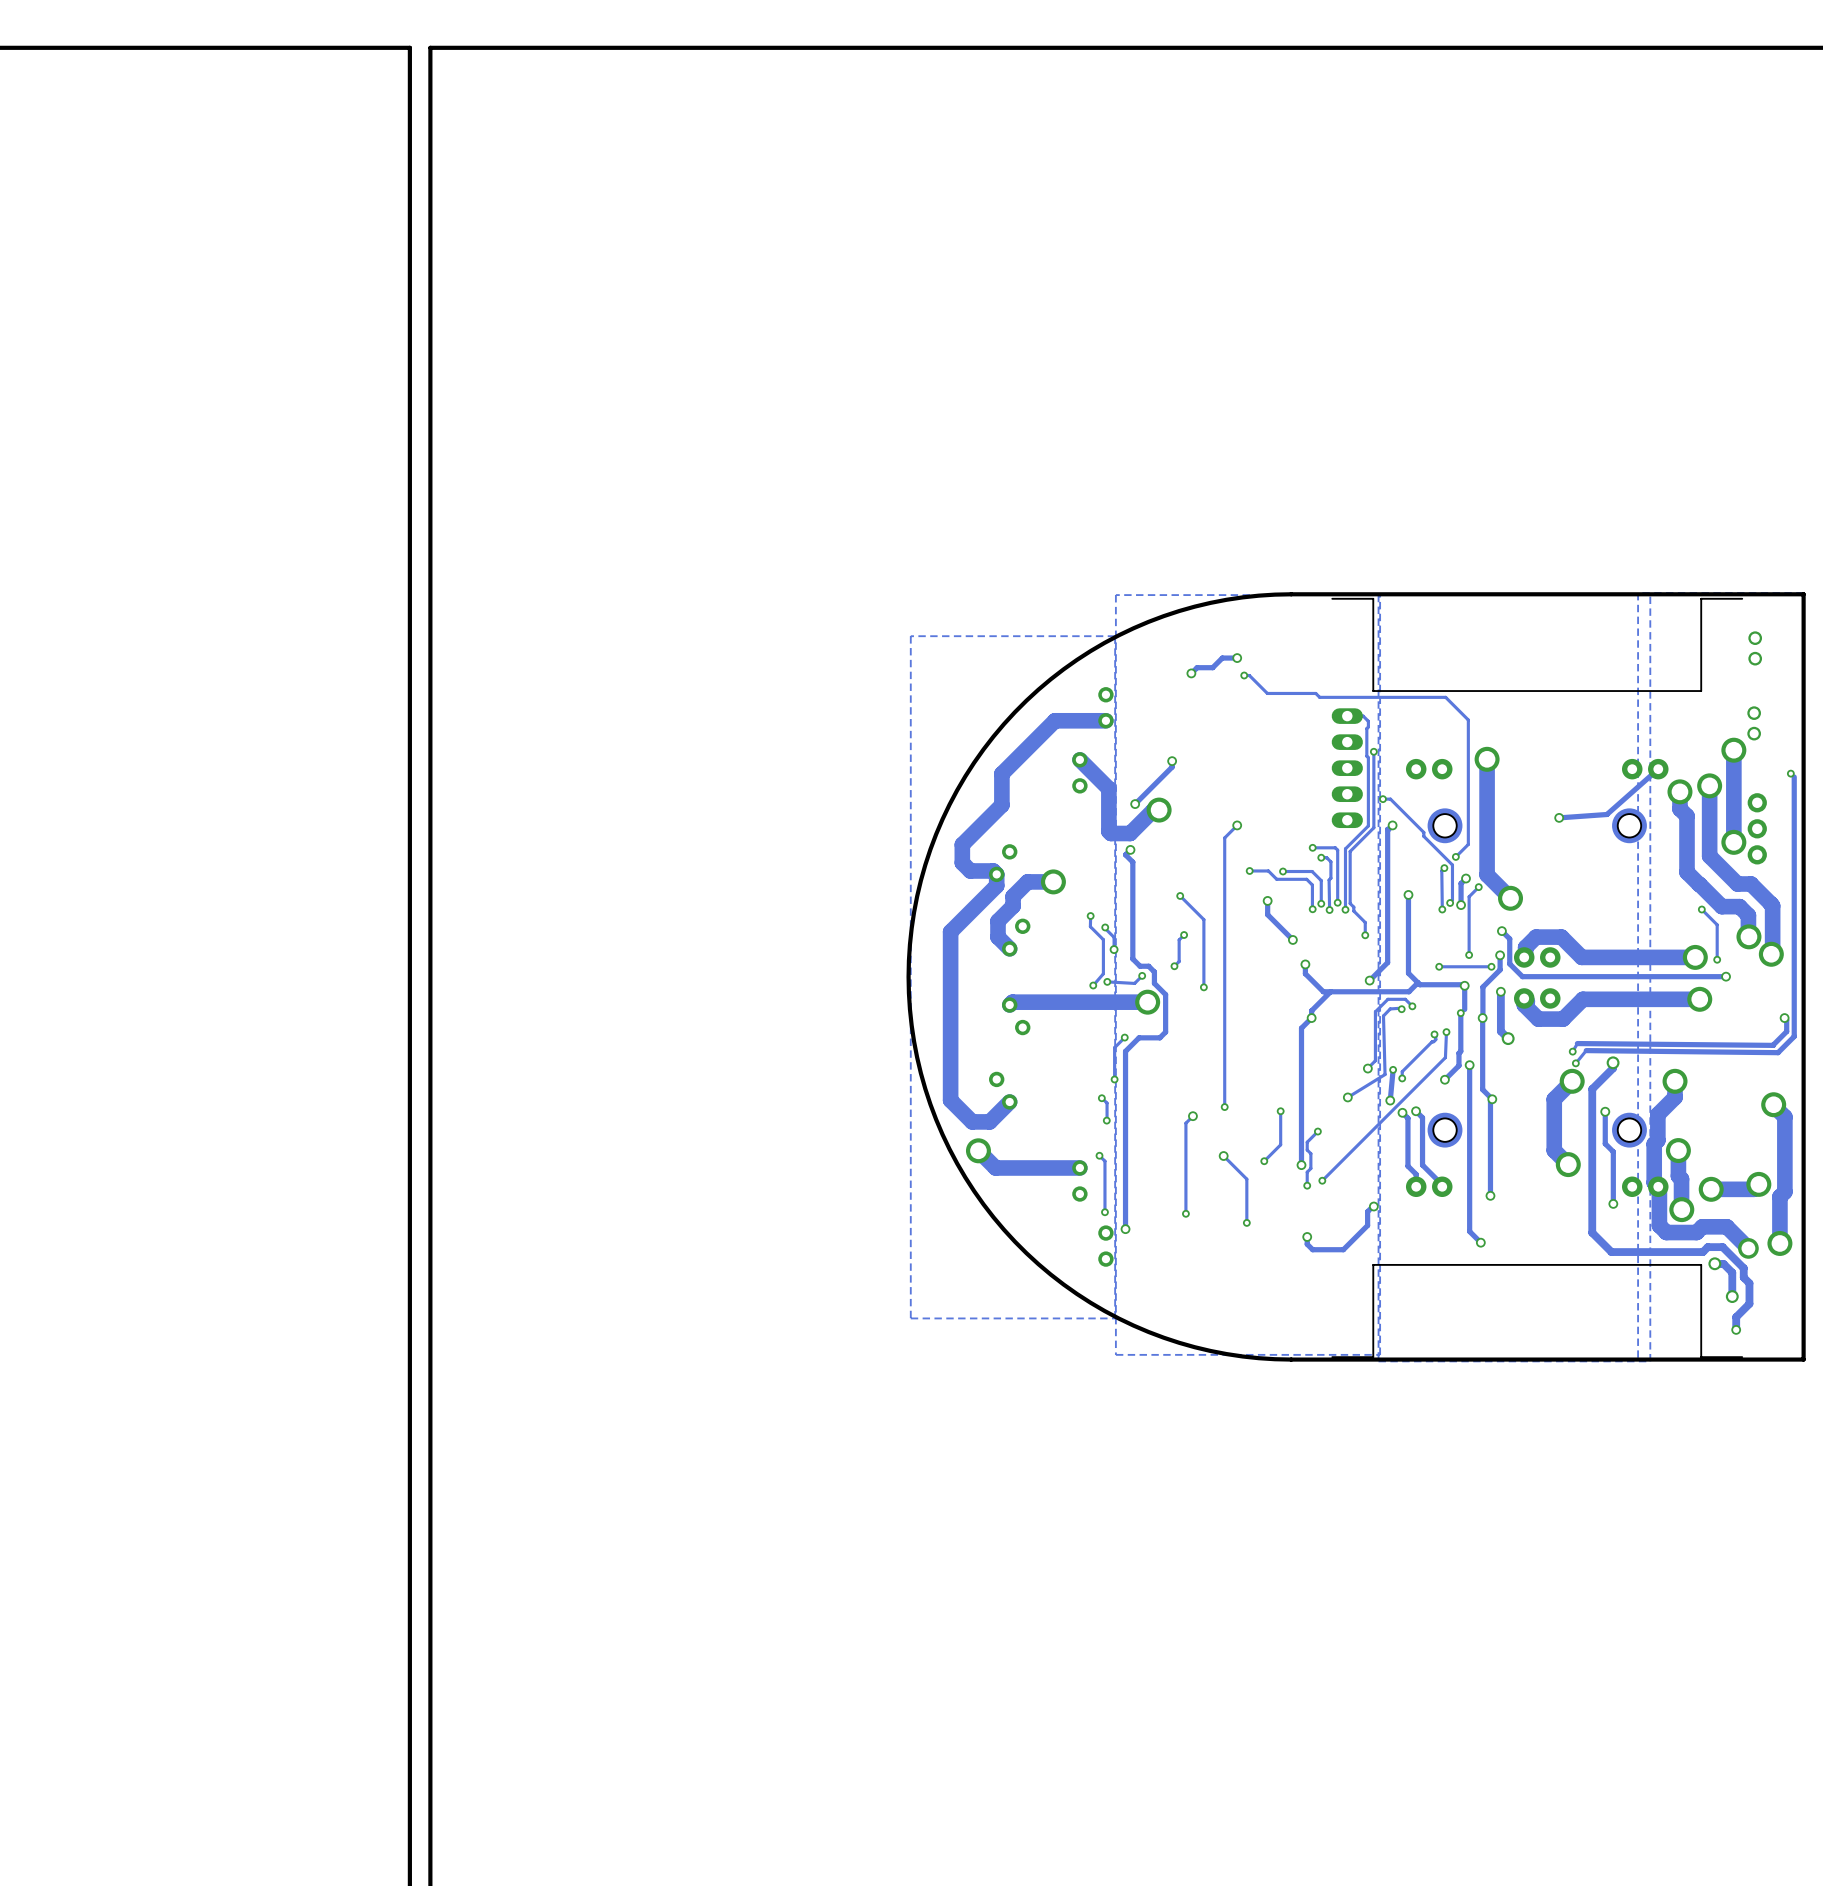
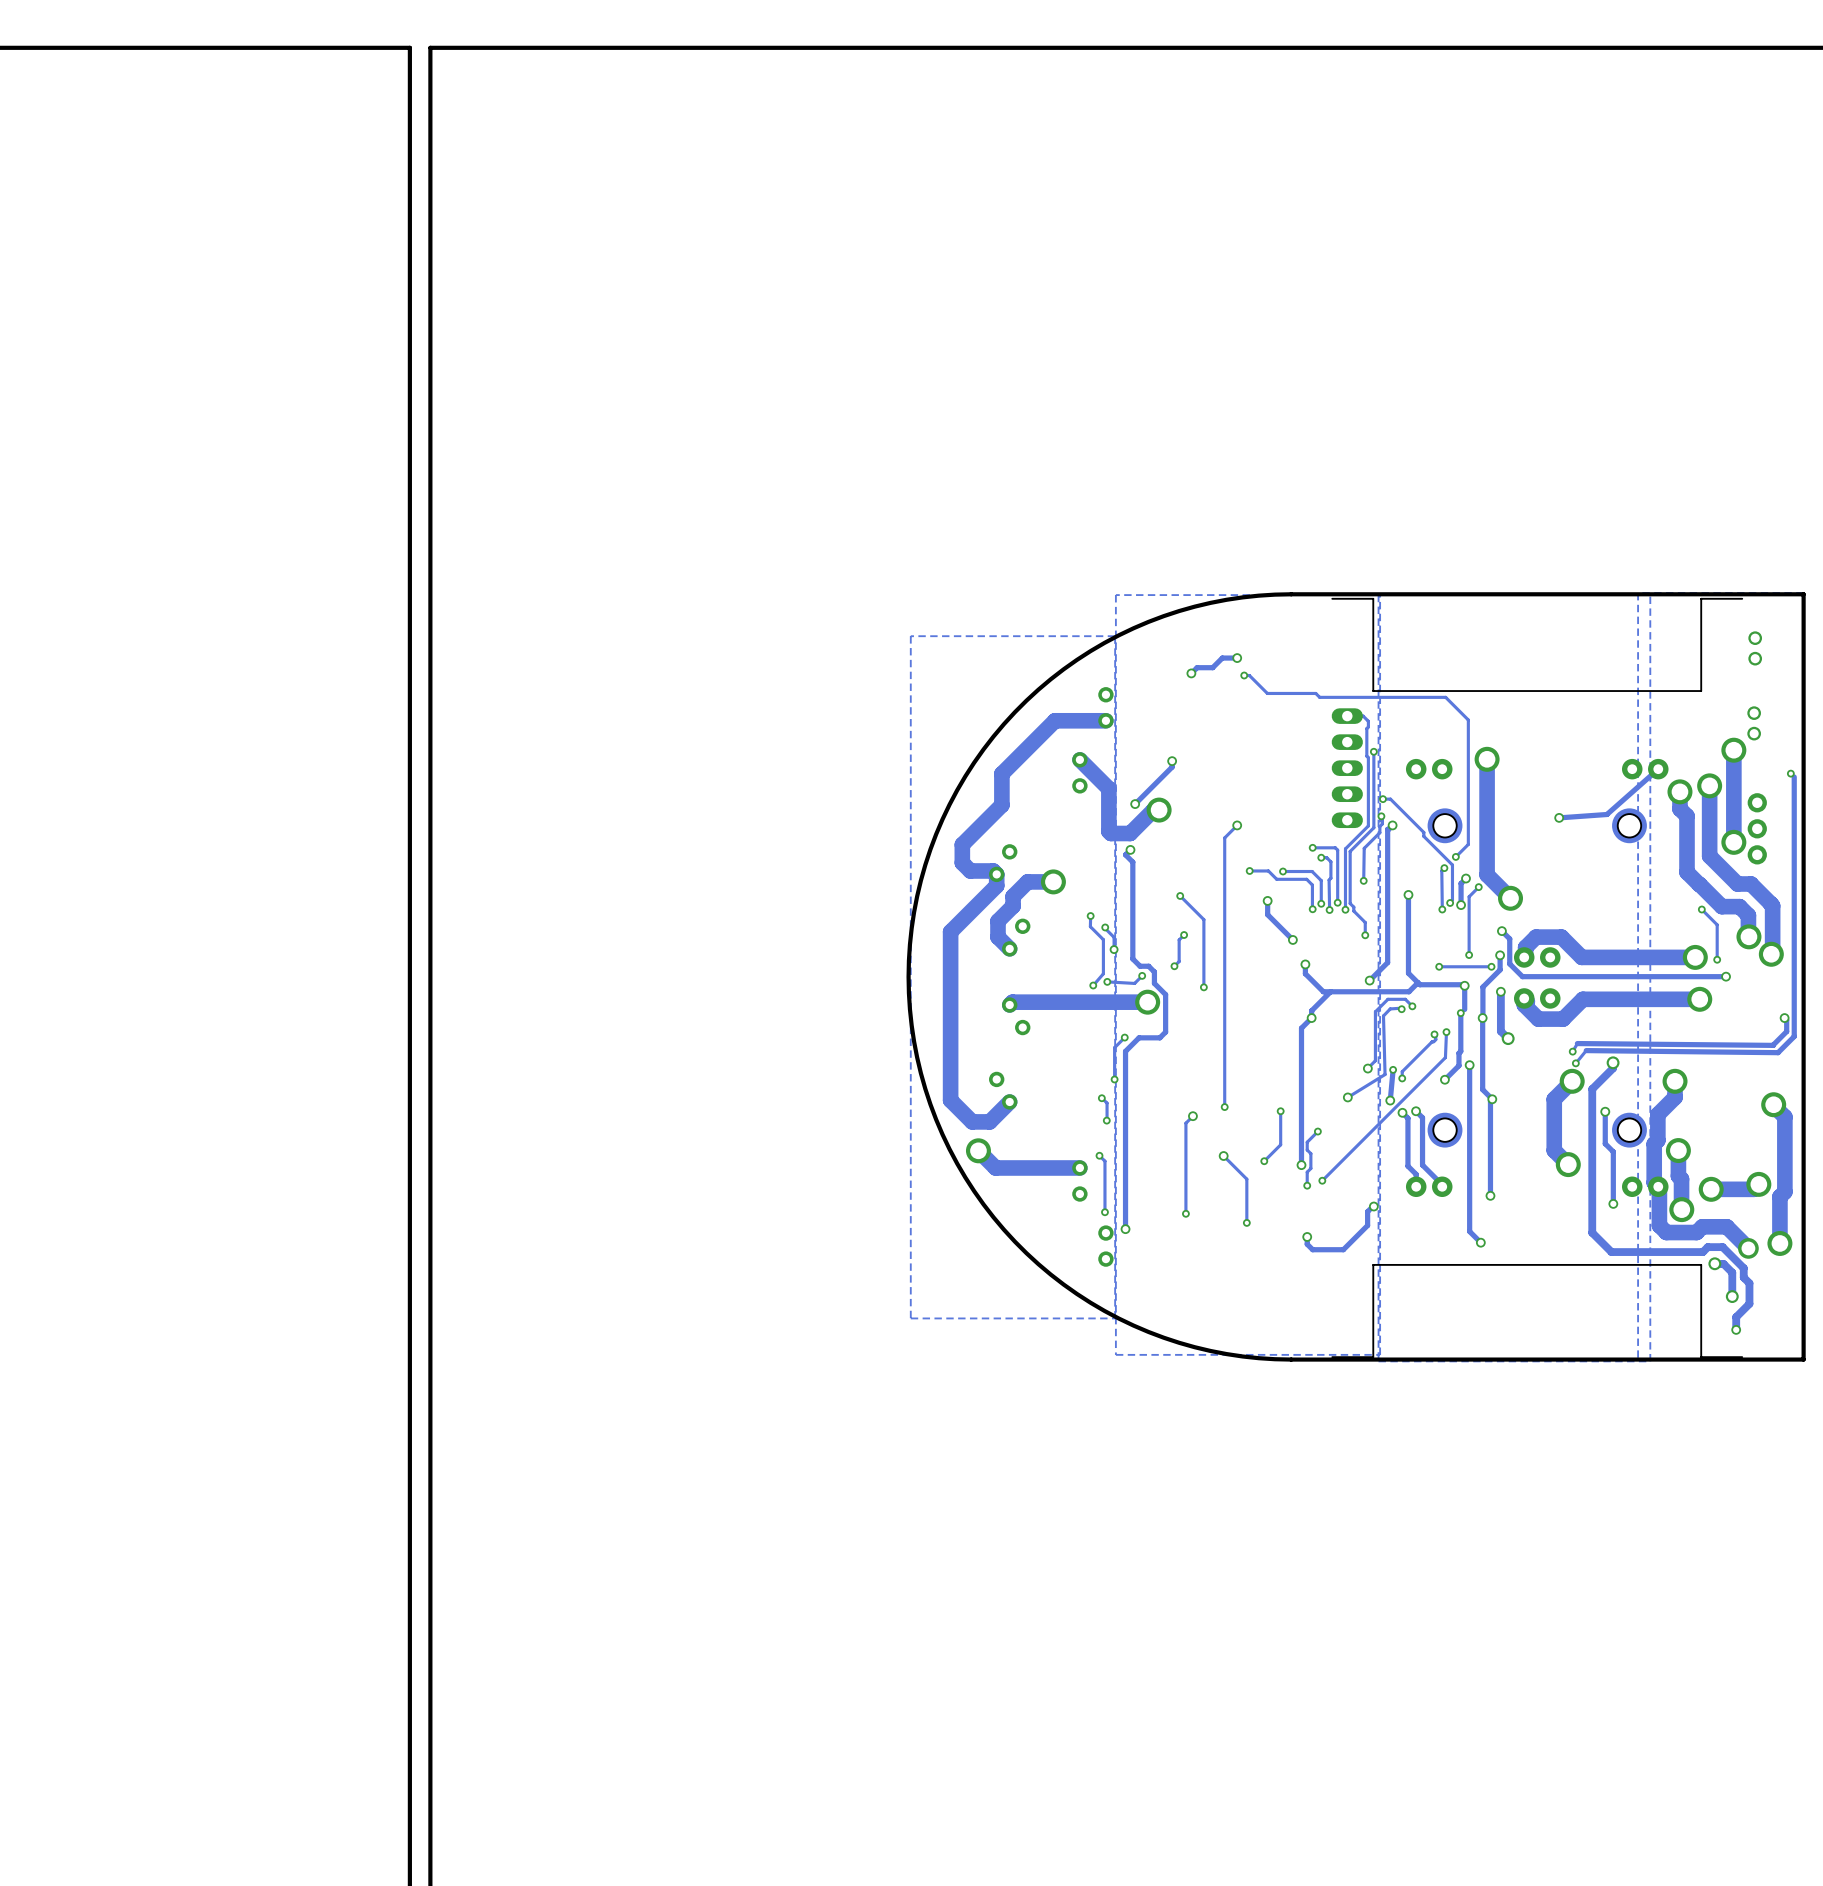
track: none -> (1381, 816) (1382, 823) (1379, 826) (1379, 832) (1364, 848) (1363, 880)
via: none -> (1381, 816)
via: none -> (1363, 880)

